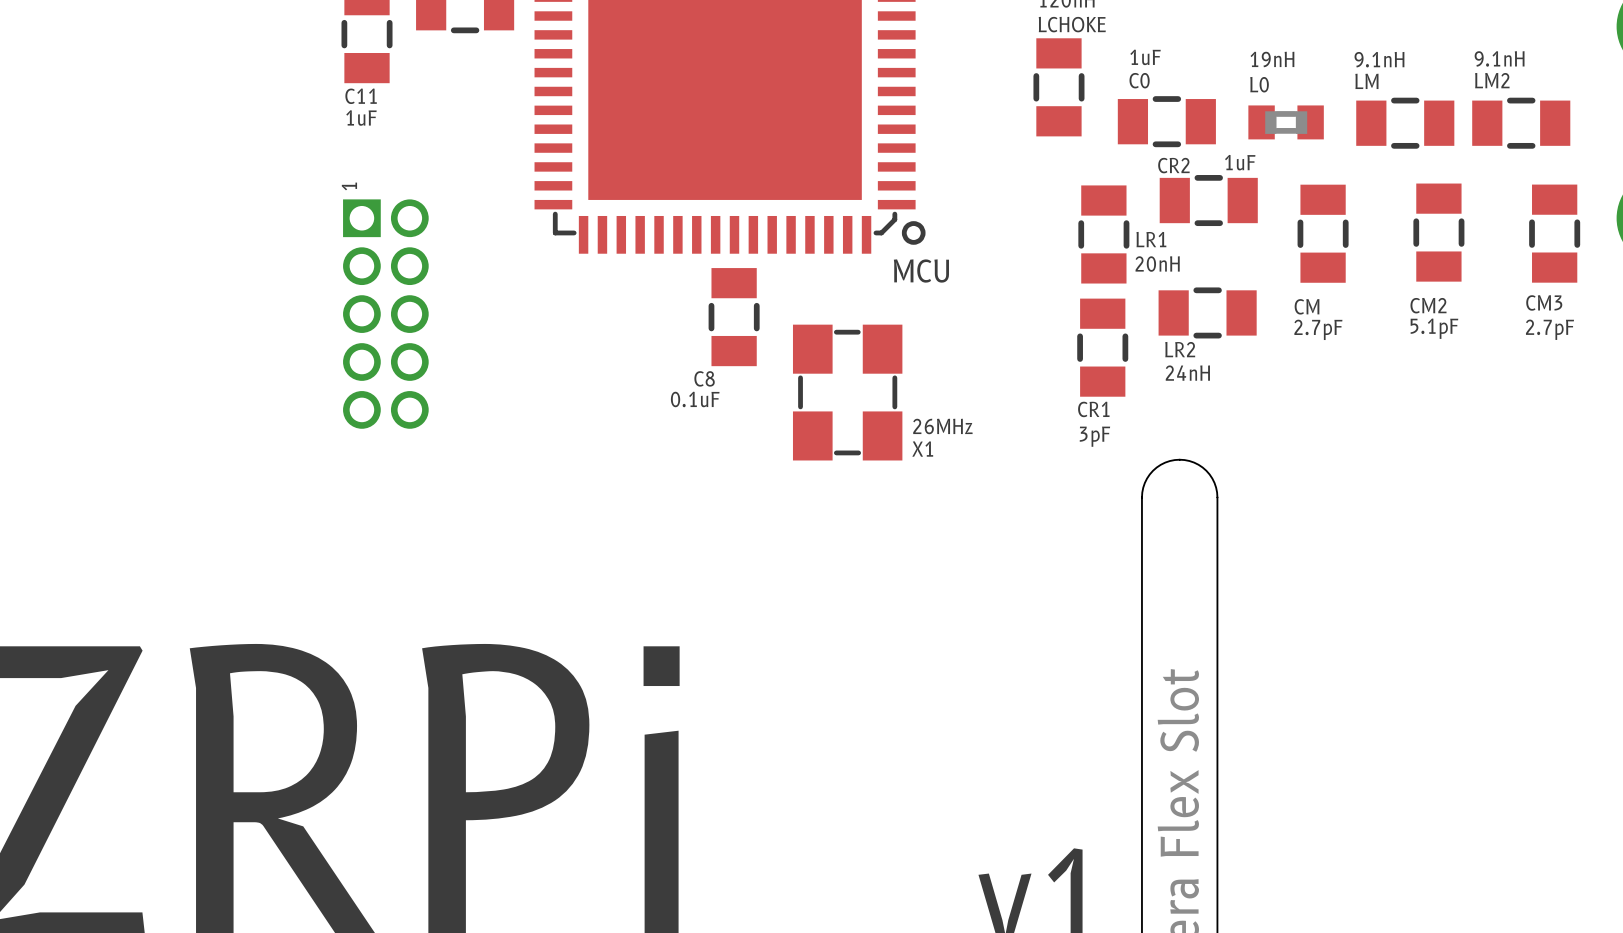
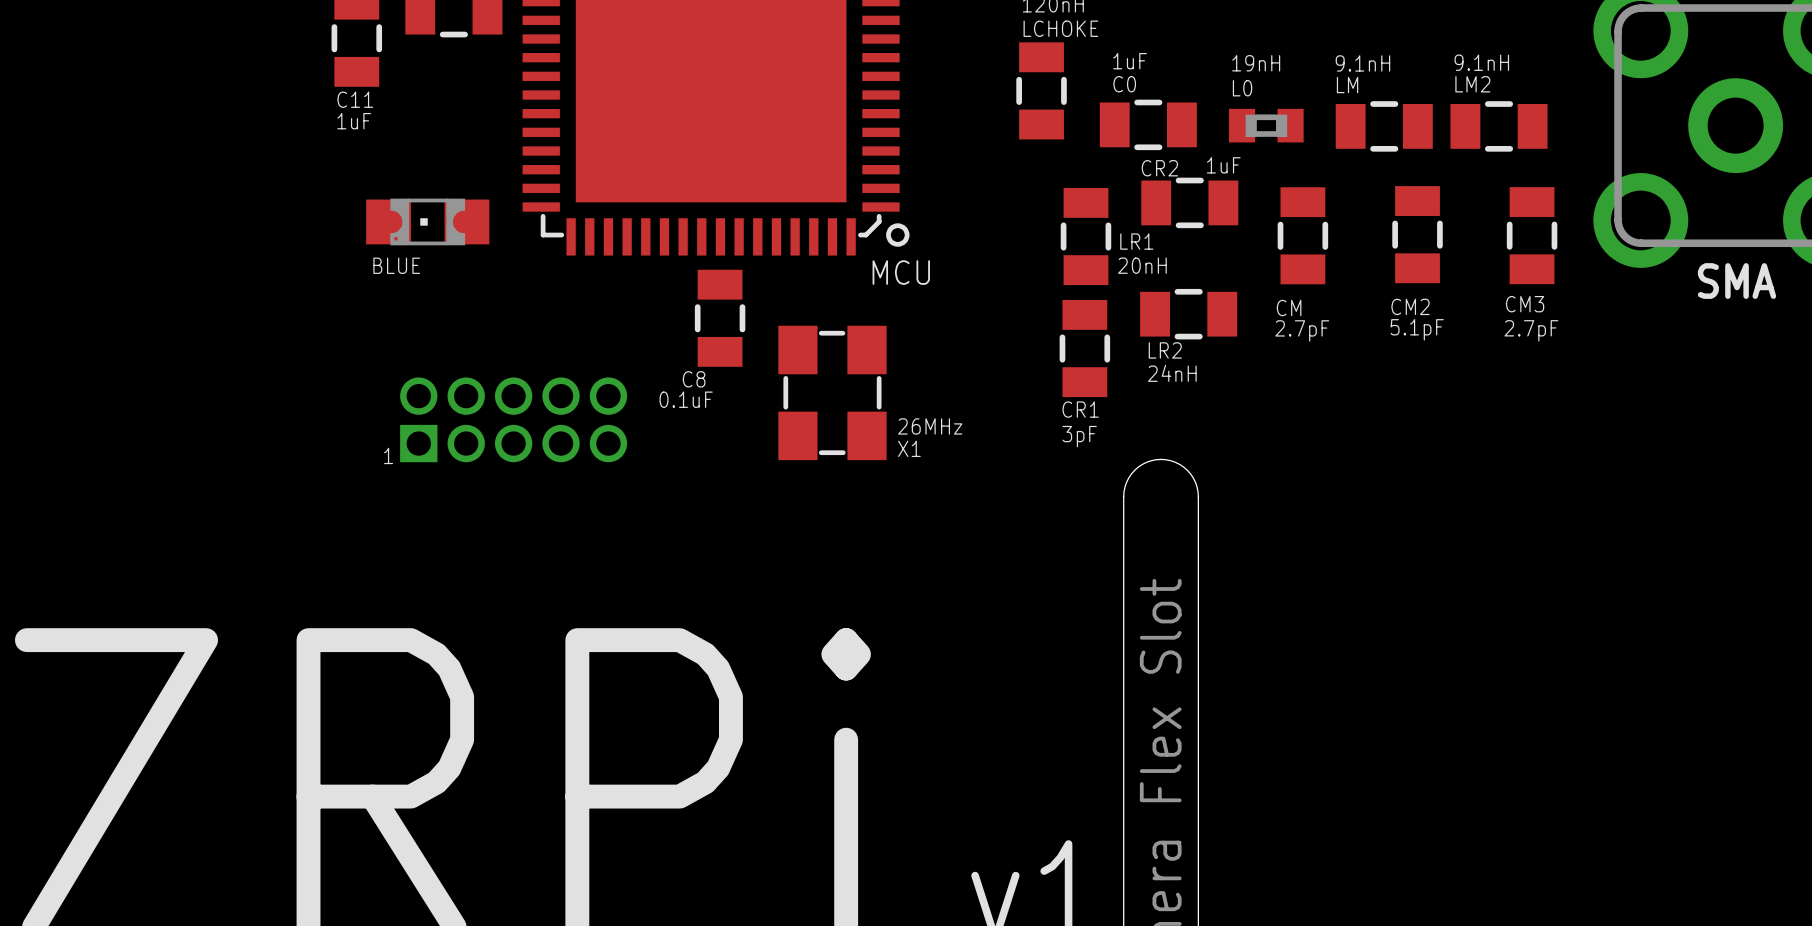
BLUE: none -> (427, 221)
part: (385, 314) -> none
part: none -> (513, 419)

